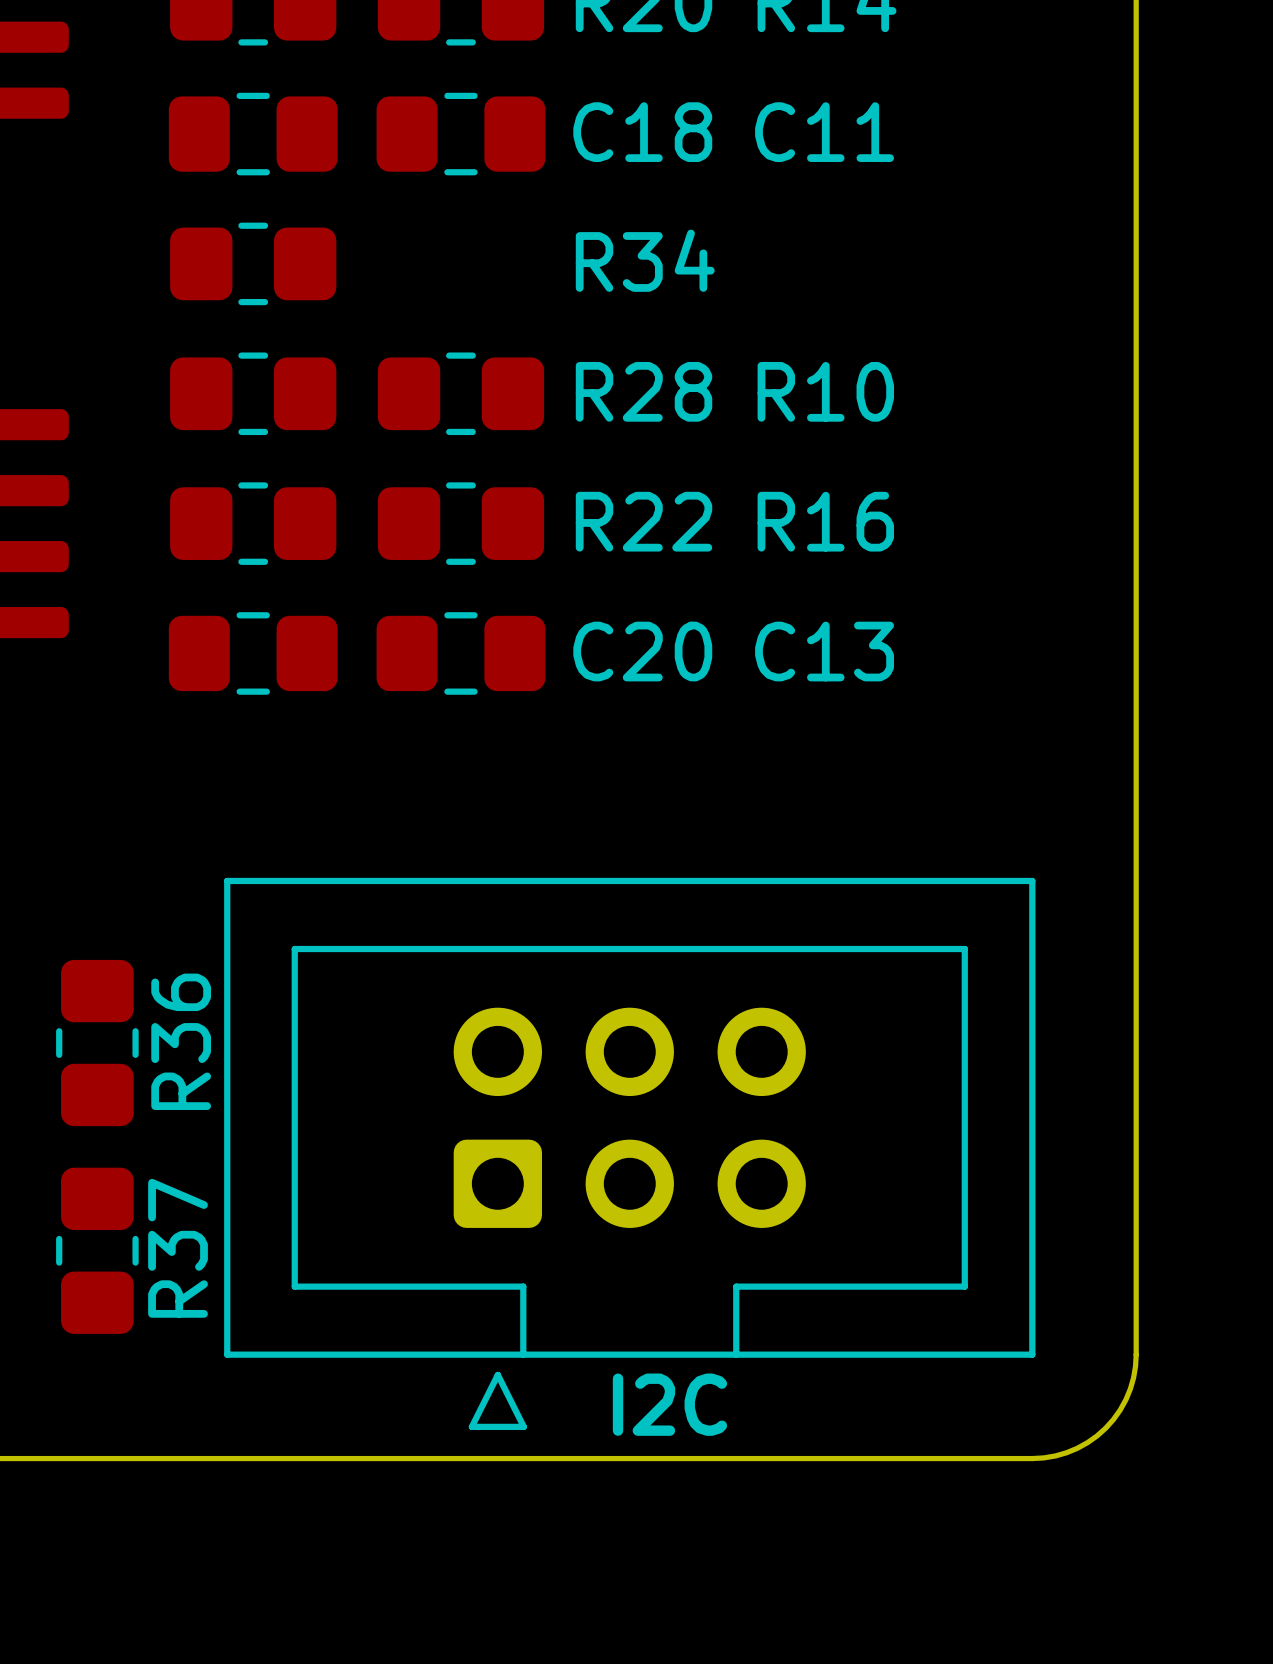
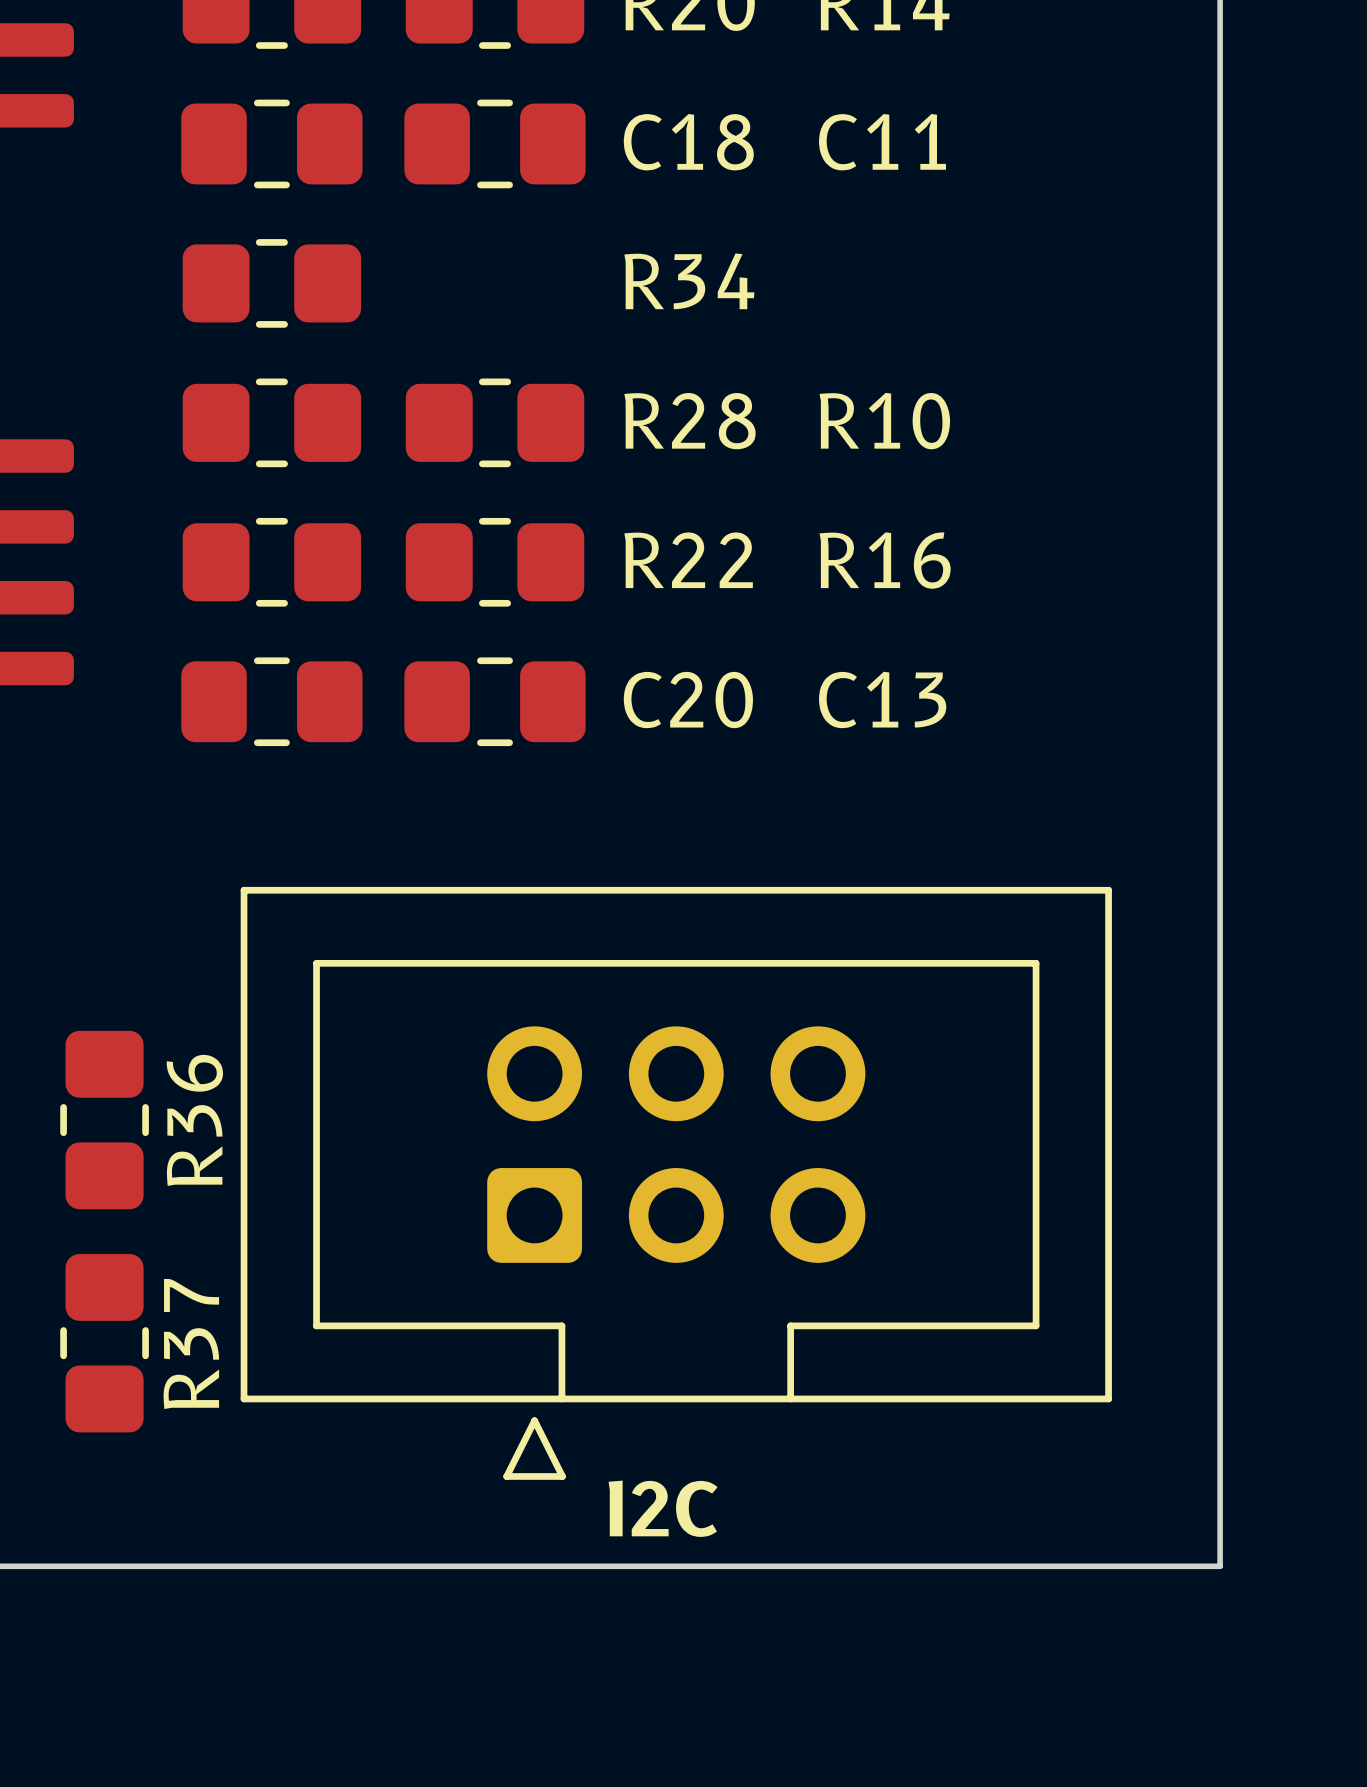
part position: (629, 1153) -> (676, 1183)
board edge: (1136, 1354) (1133, 1377) (1125, 1399) (1105, 1428) (1087, 1442) (1066, 1452) (1032, 1458) -> (1220, 1454) (1220, 1566) (1108, 1566)
part value position: I2C (669, 1404) -> I2C (663, 1508)

